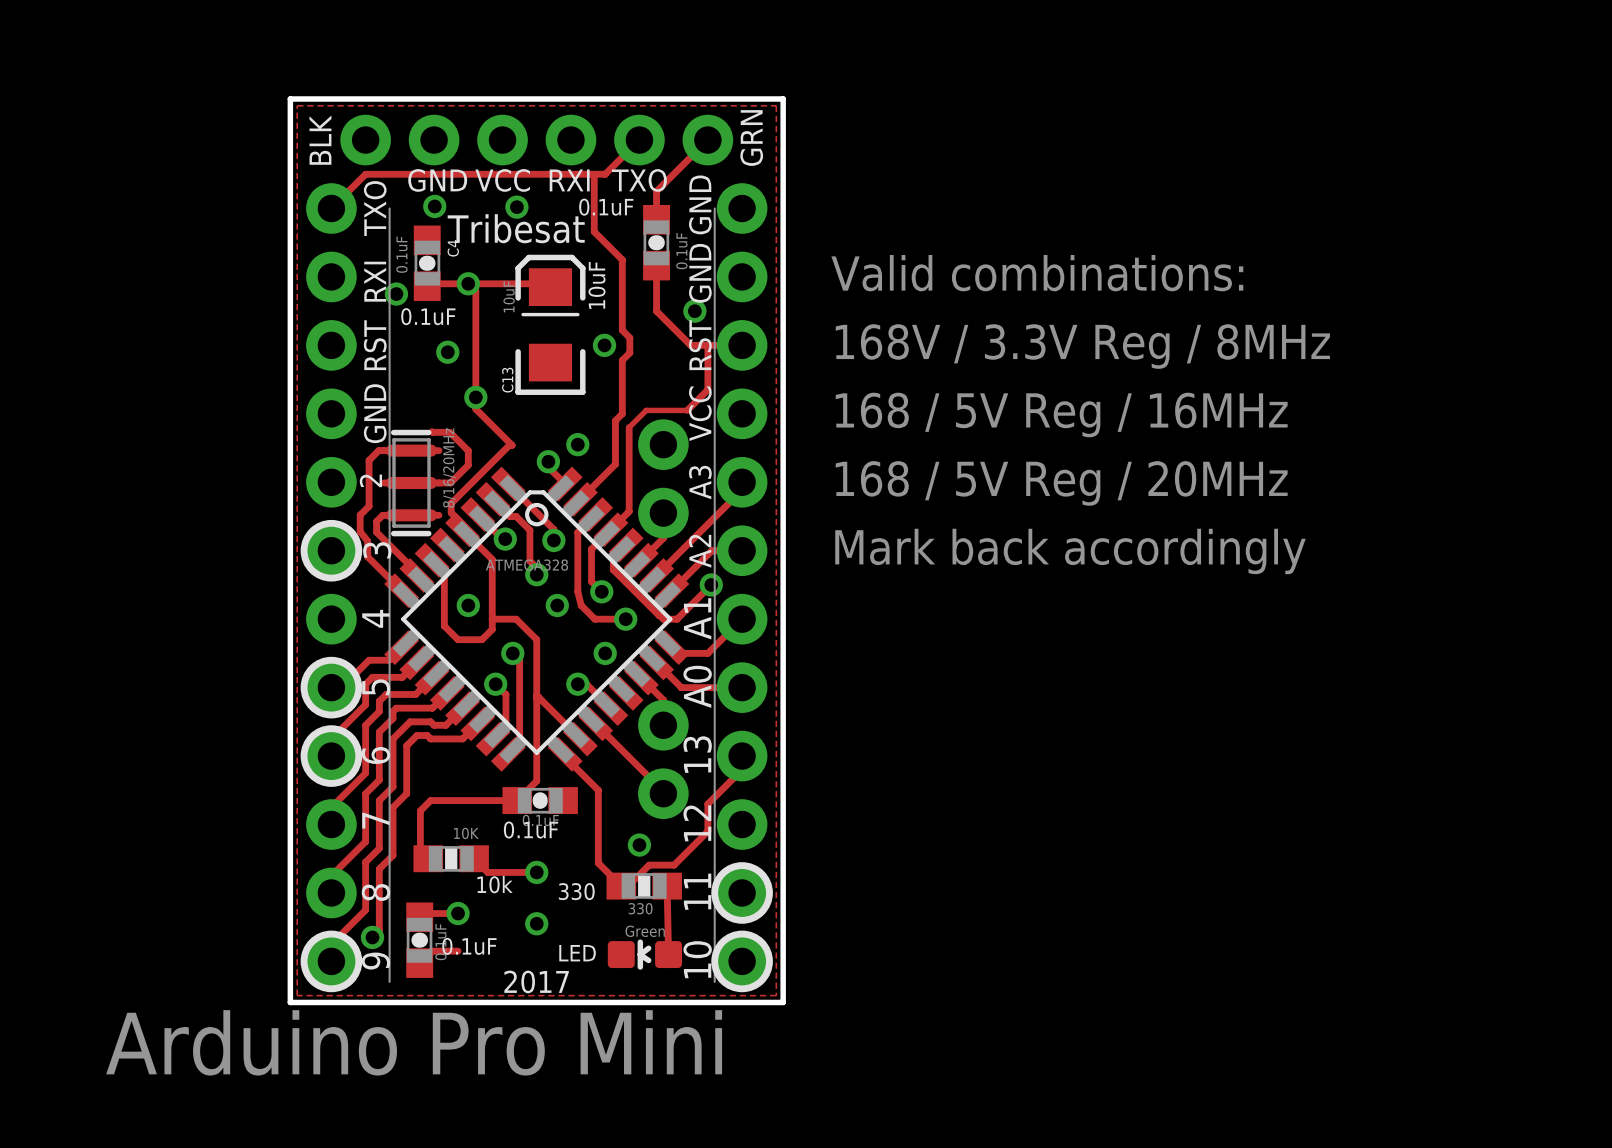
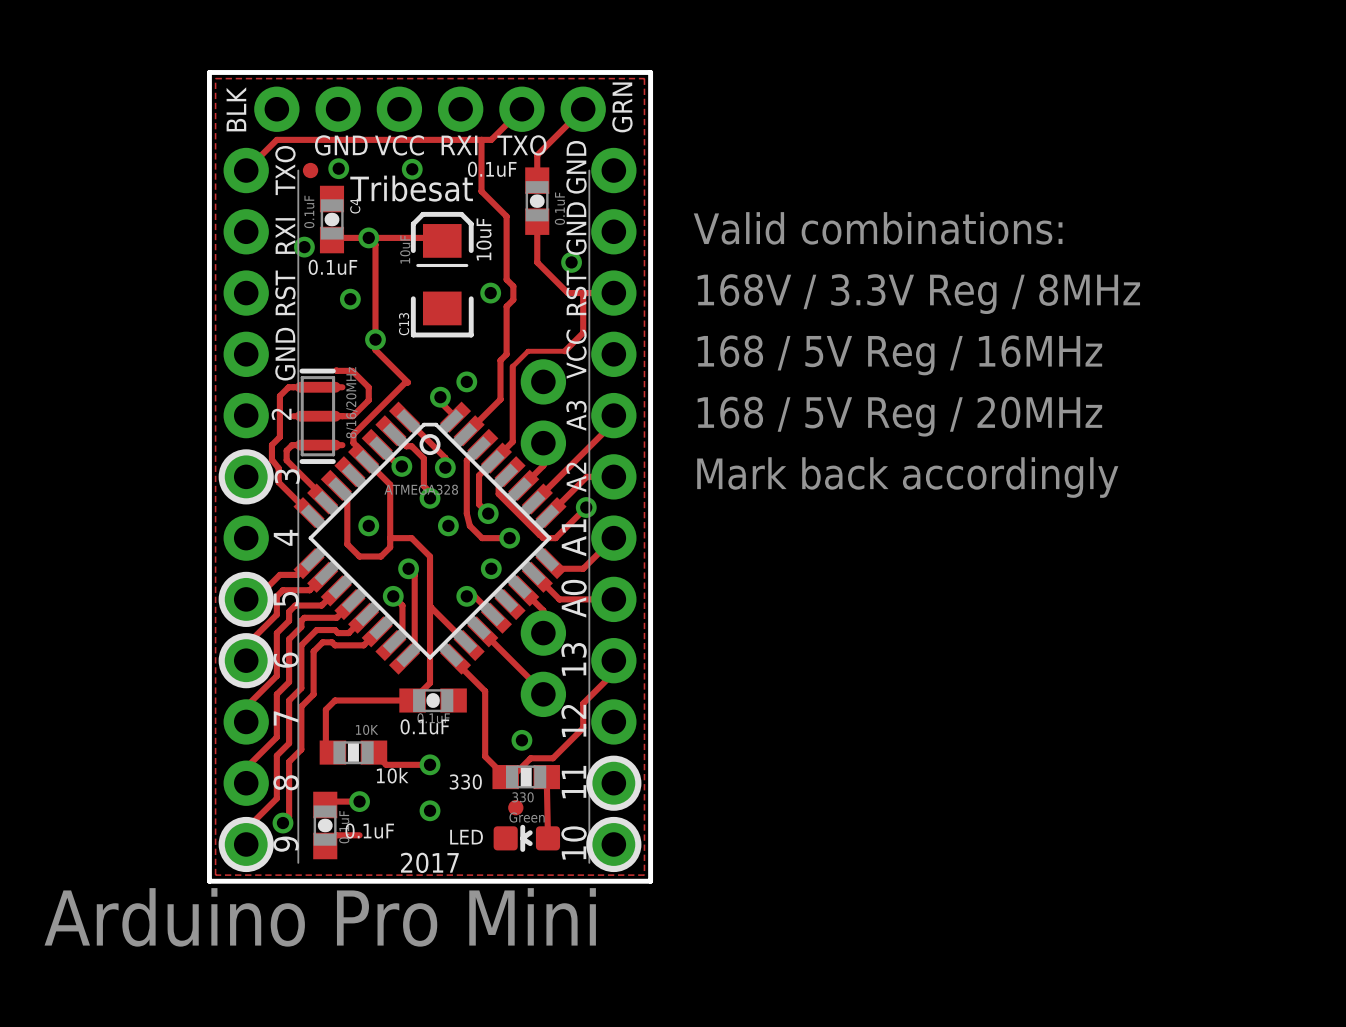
part: none -> (310, 170)
part: none -> (515, 807)

